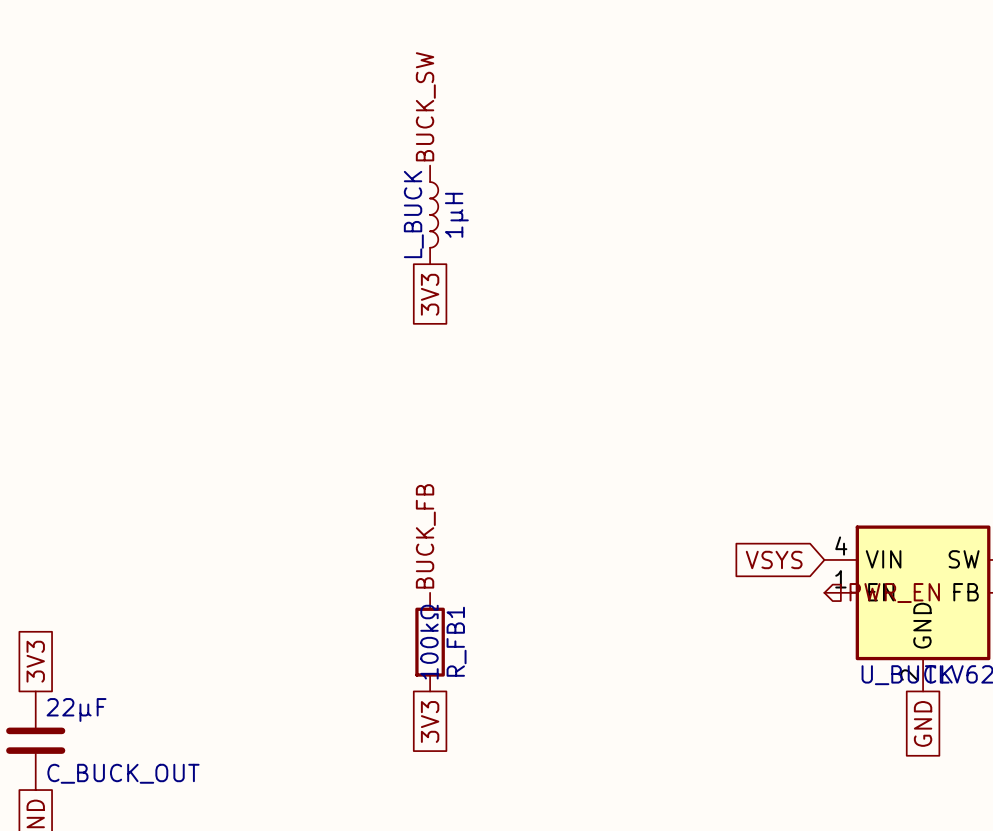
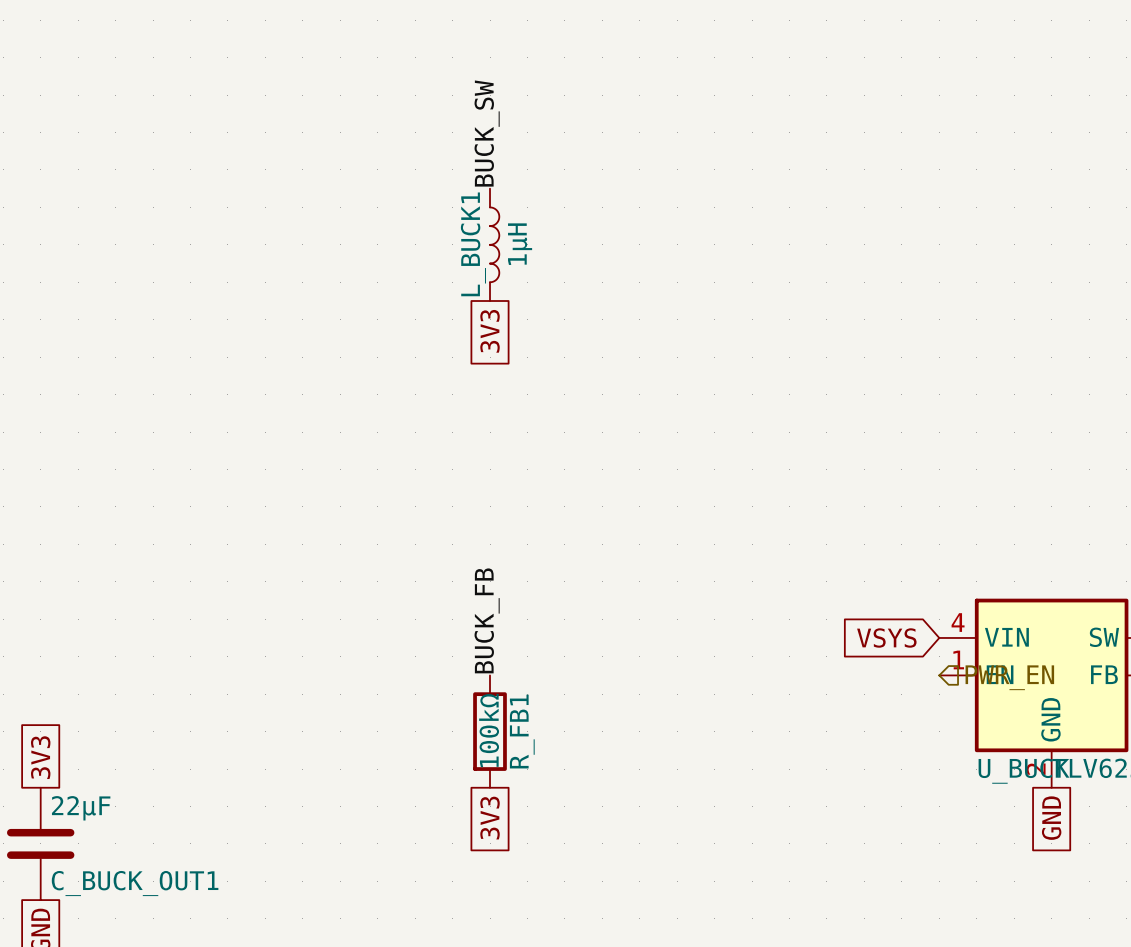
L_BUCK name: L_BUCK (413, 214) -> L_BUCK1 (473, 244)
C_BUCK_OUT name: C_BUCK_OUT (123, 773) -> C_BUCK_OUT1 (135, 883)

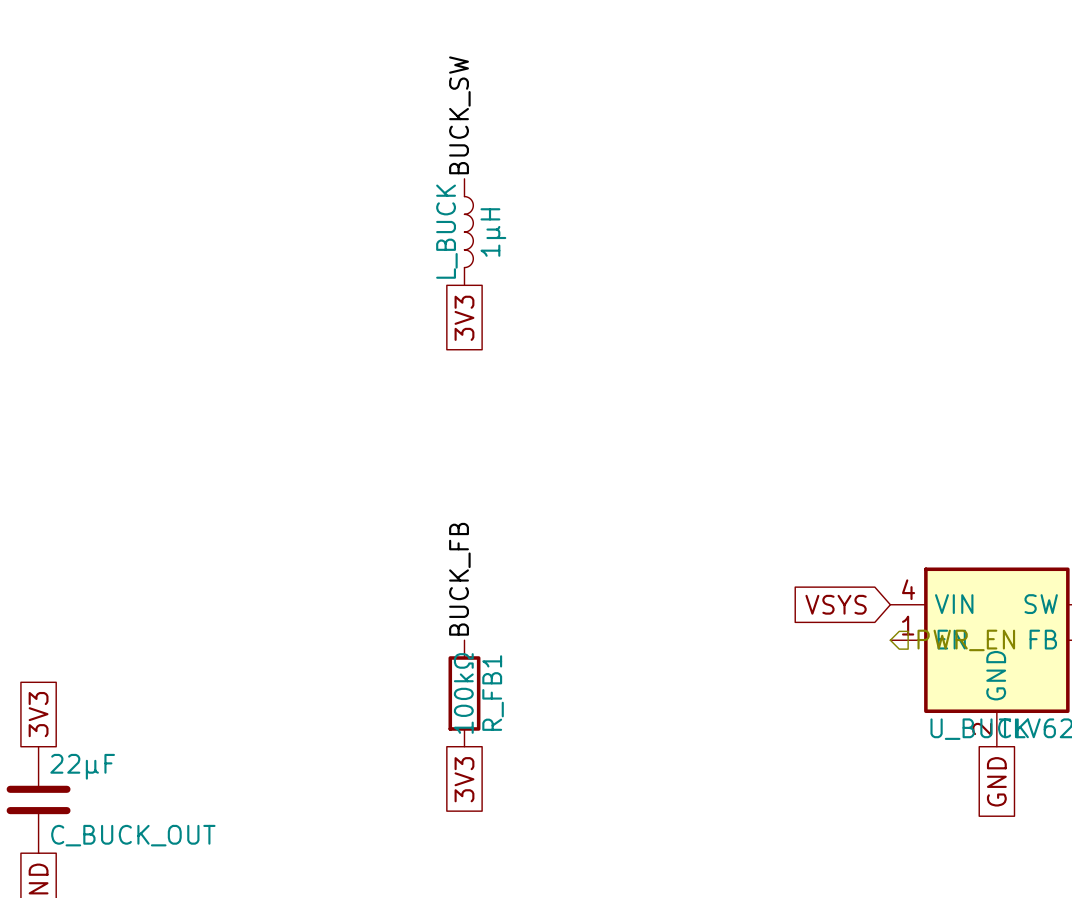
L_BUCK1 name: L_BUCK1 (473, 244) -> L_BUCK (446, 231)
C_BUCK_OUT1 name: C_BUCK_OUT1 (135, 883) -> C_BUCK_OUT (133, 835)

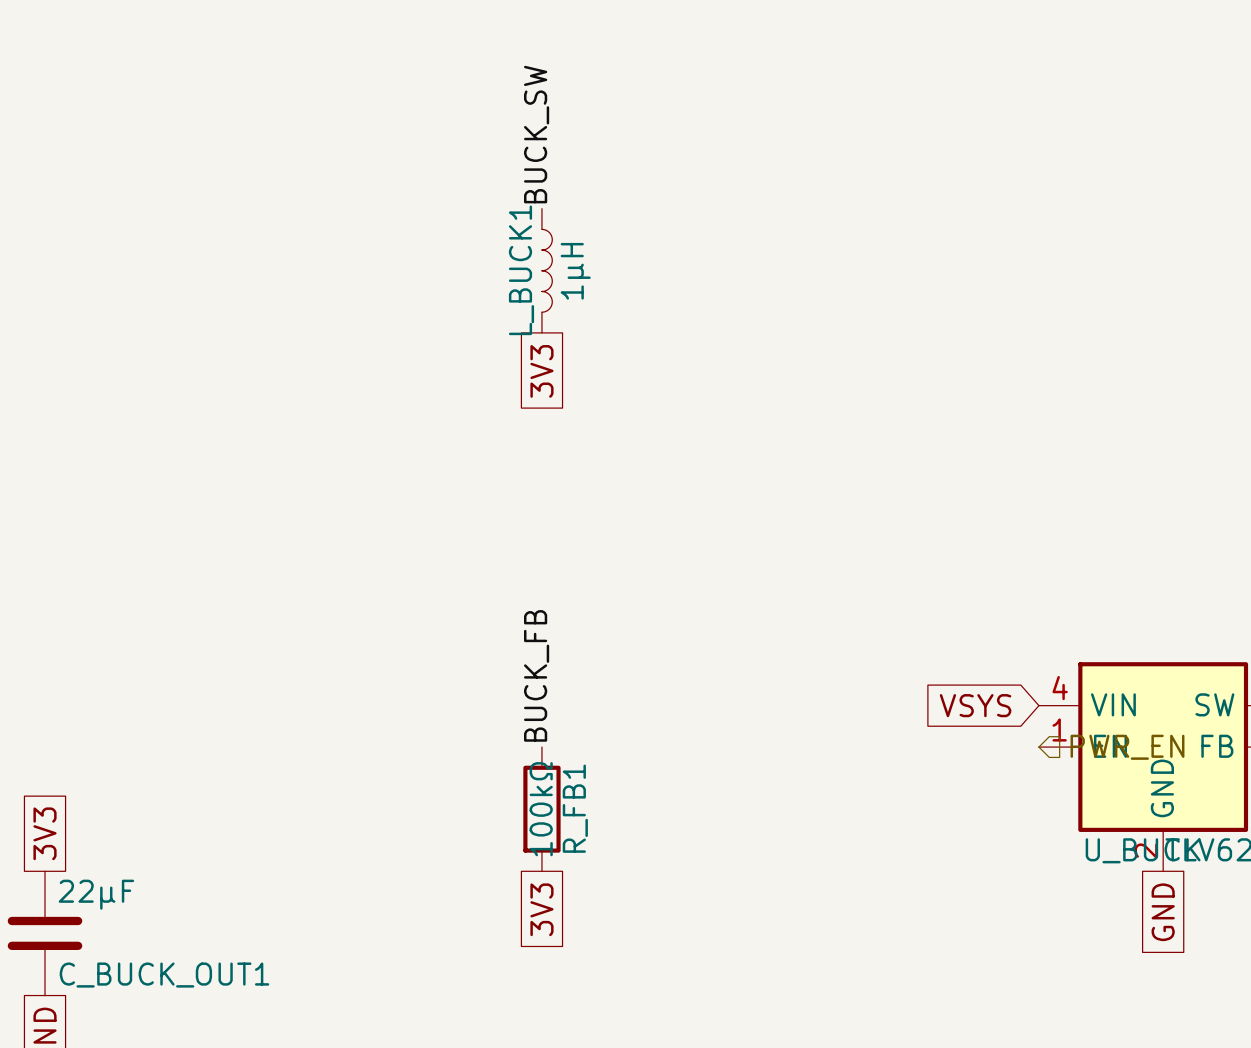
L_BUCK name: L_BUCK (446, 231) -> L_BUCK1 (521, 270)
C_BUCK_OUT name: C_BUCK_OUT (133, 835) -> C_BUCK_OUT1 (164, 975)

